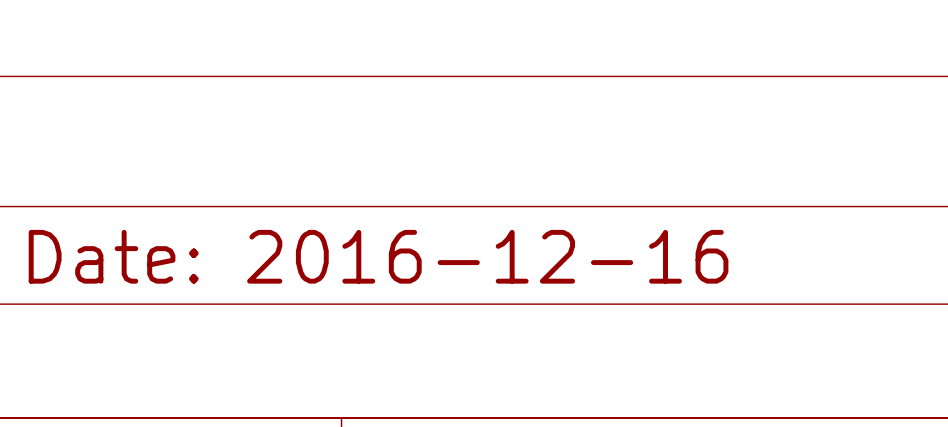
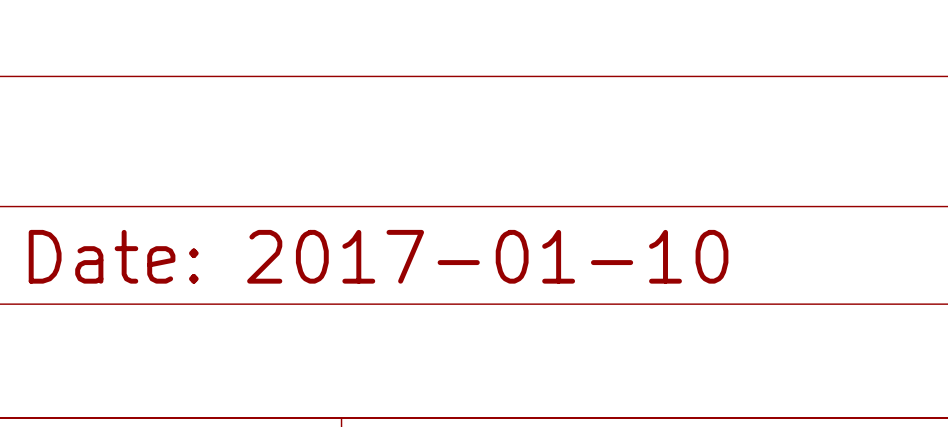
title block: Date: 2016-12-16 (378, 256) -> Date: 2017-01-10 (378, 256)

